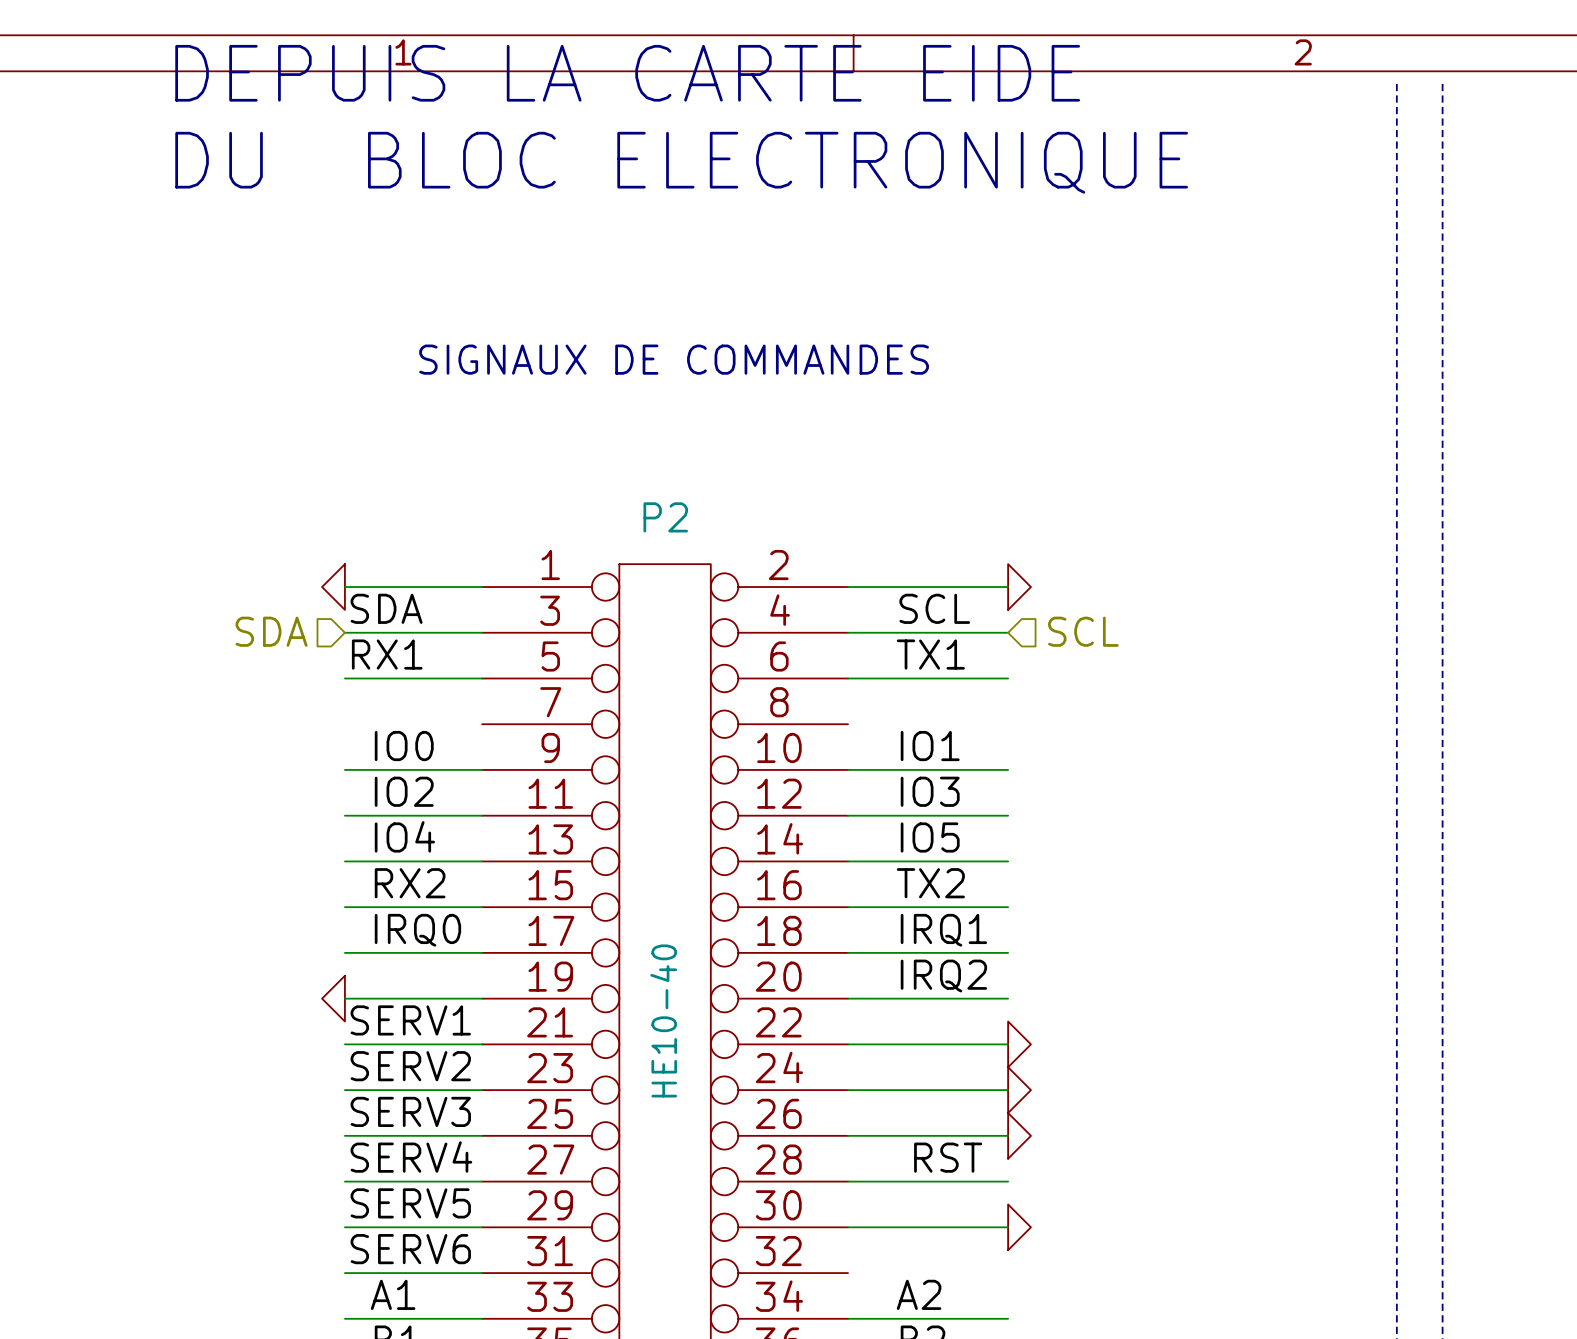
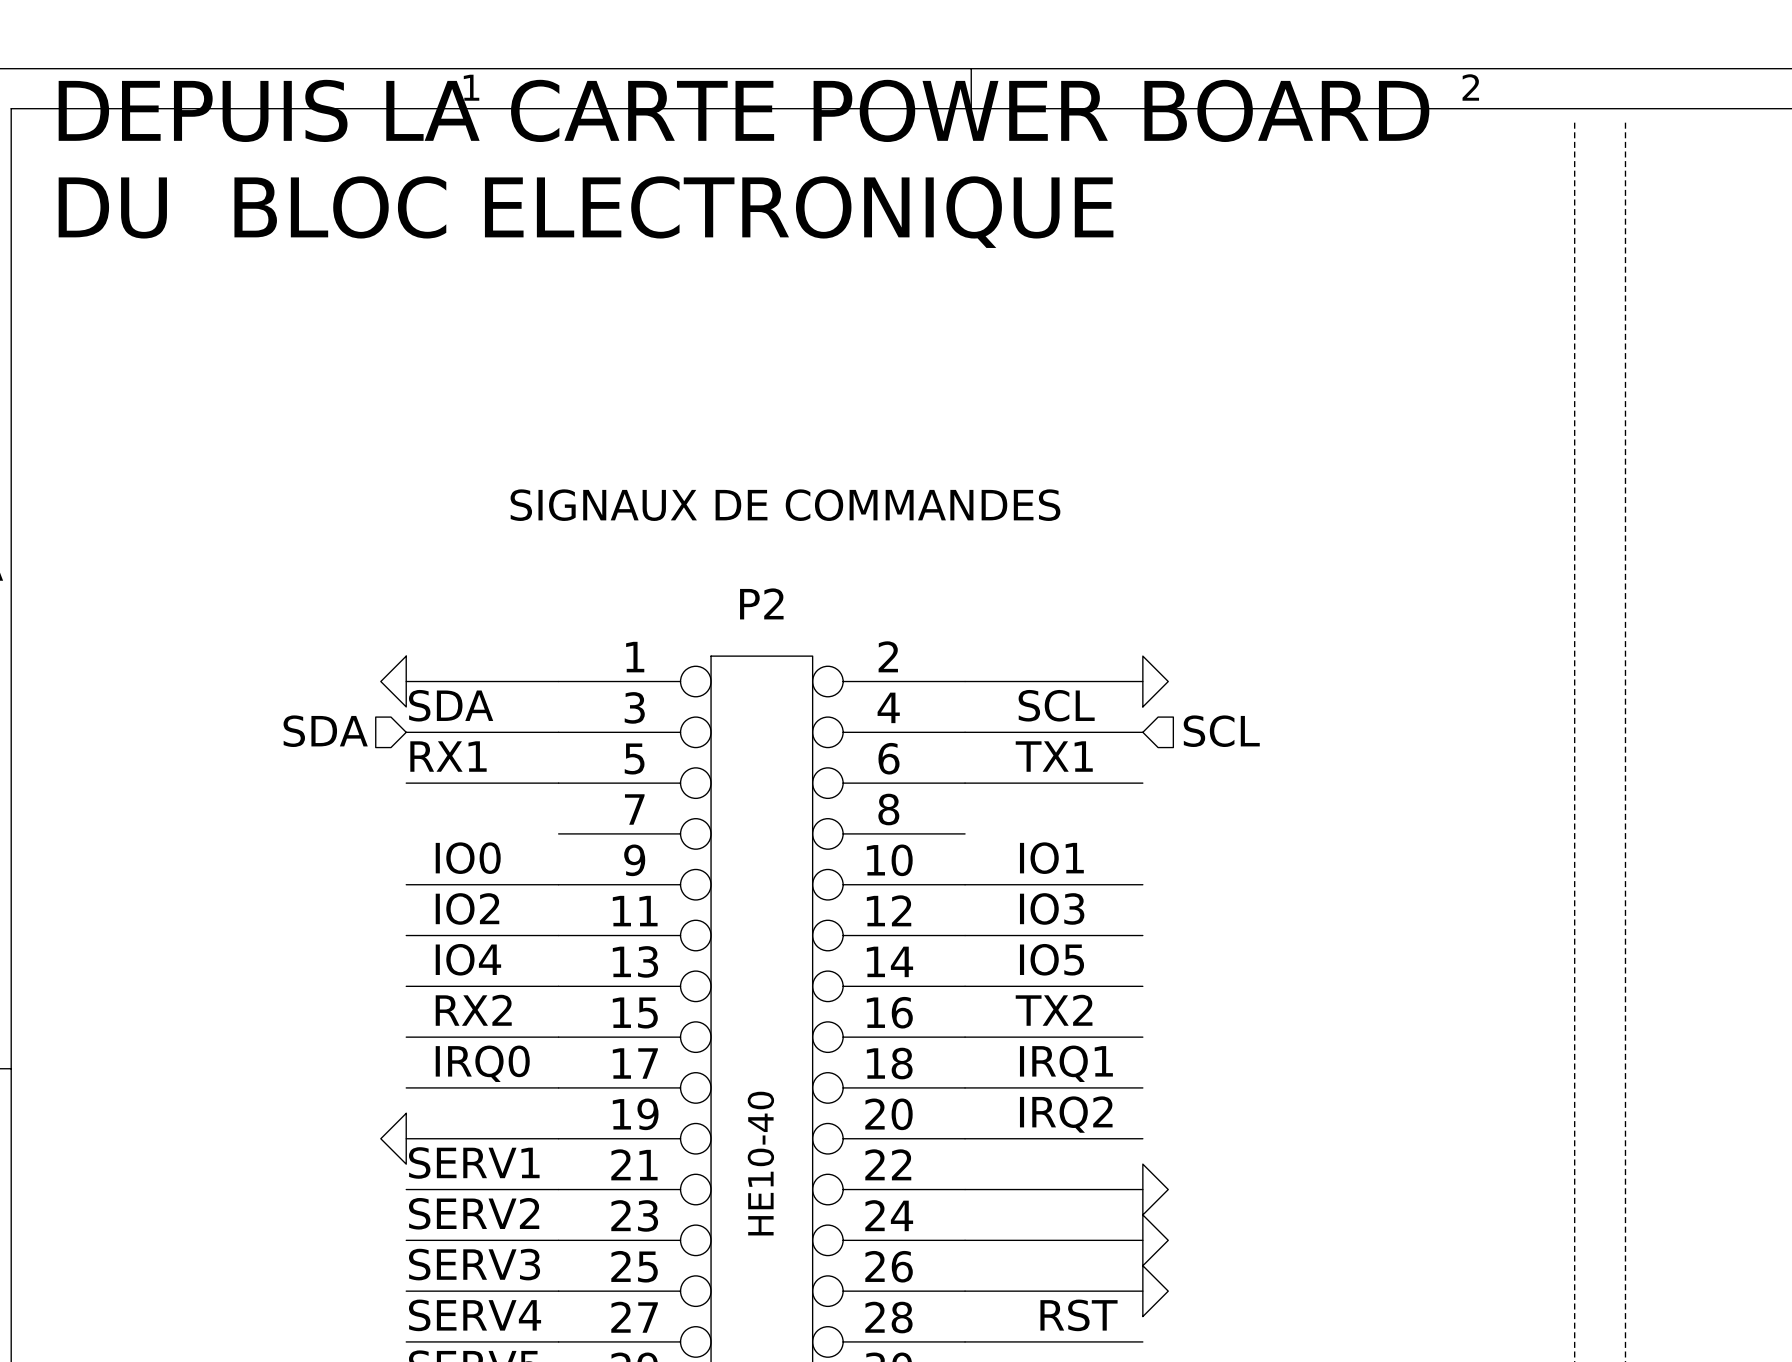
text: DEPUIS LA CARTE EIDE (627, 73) -> DEPUIS LA CARTE POWER BOARD (743, 110)
text position: DU BLOC ELECTRONIQUE (681, 162) -> DU BLOC ELECTRONIQUE (586, 212)
text position: SIGNAUX DE COMMANDES (674, 359) -> SIGNAUX DE COMMANDES (785, 505)

